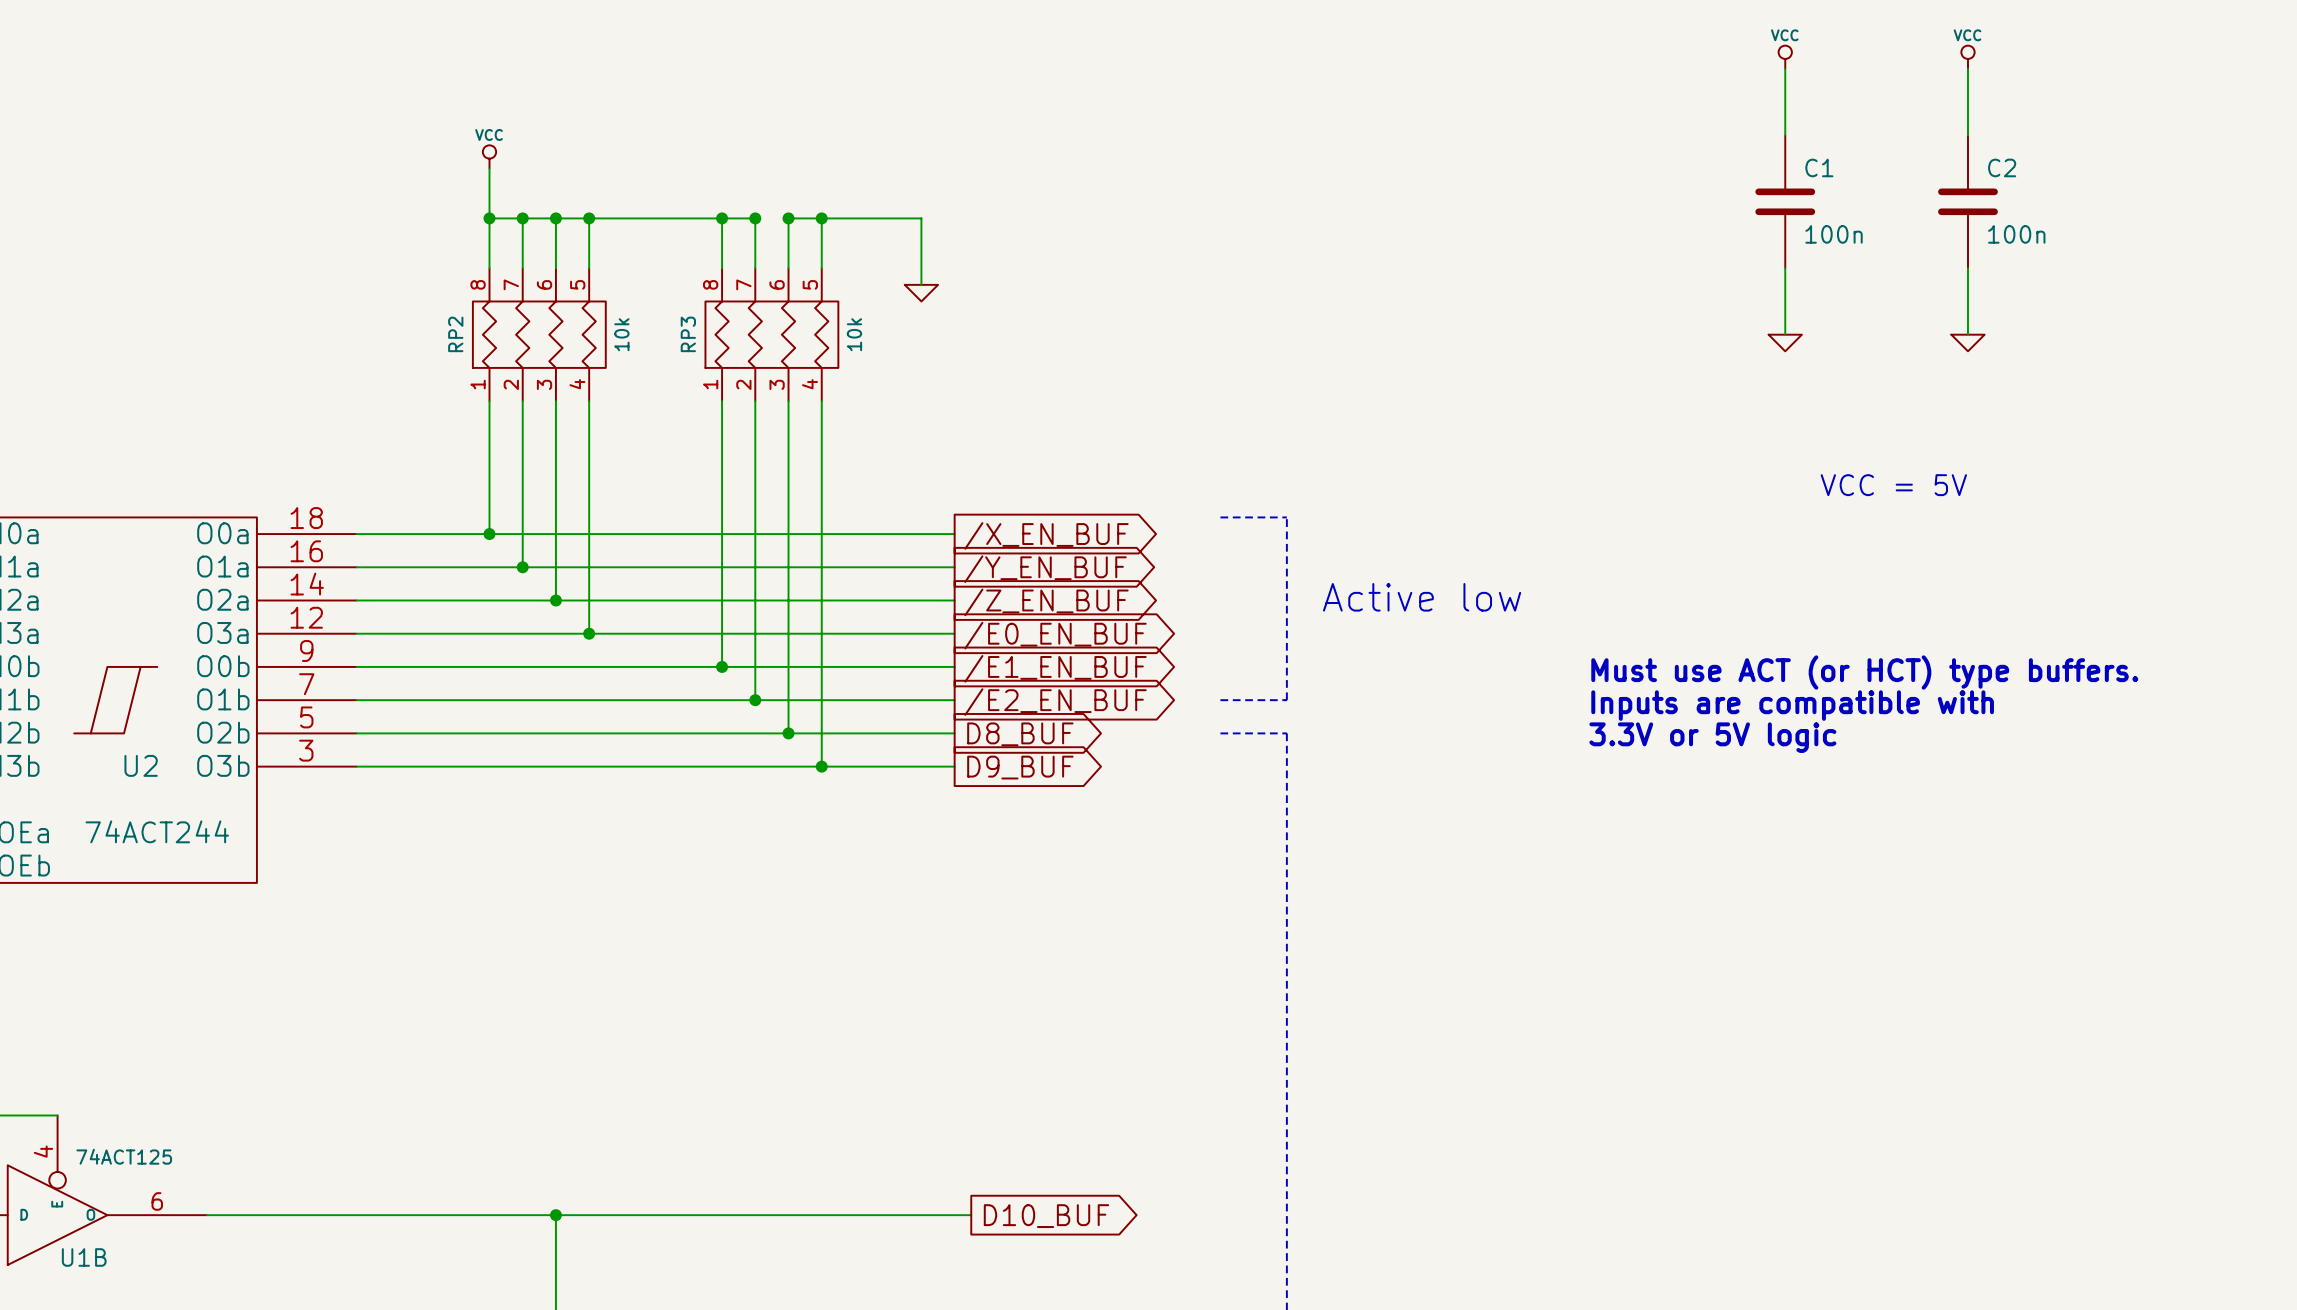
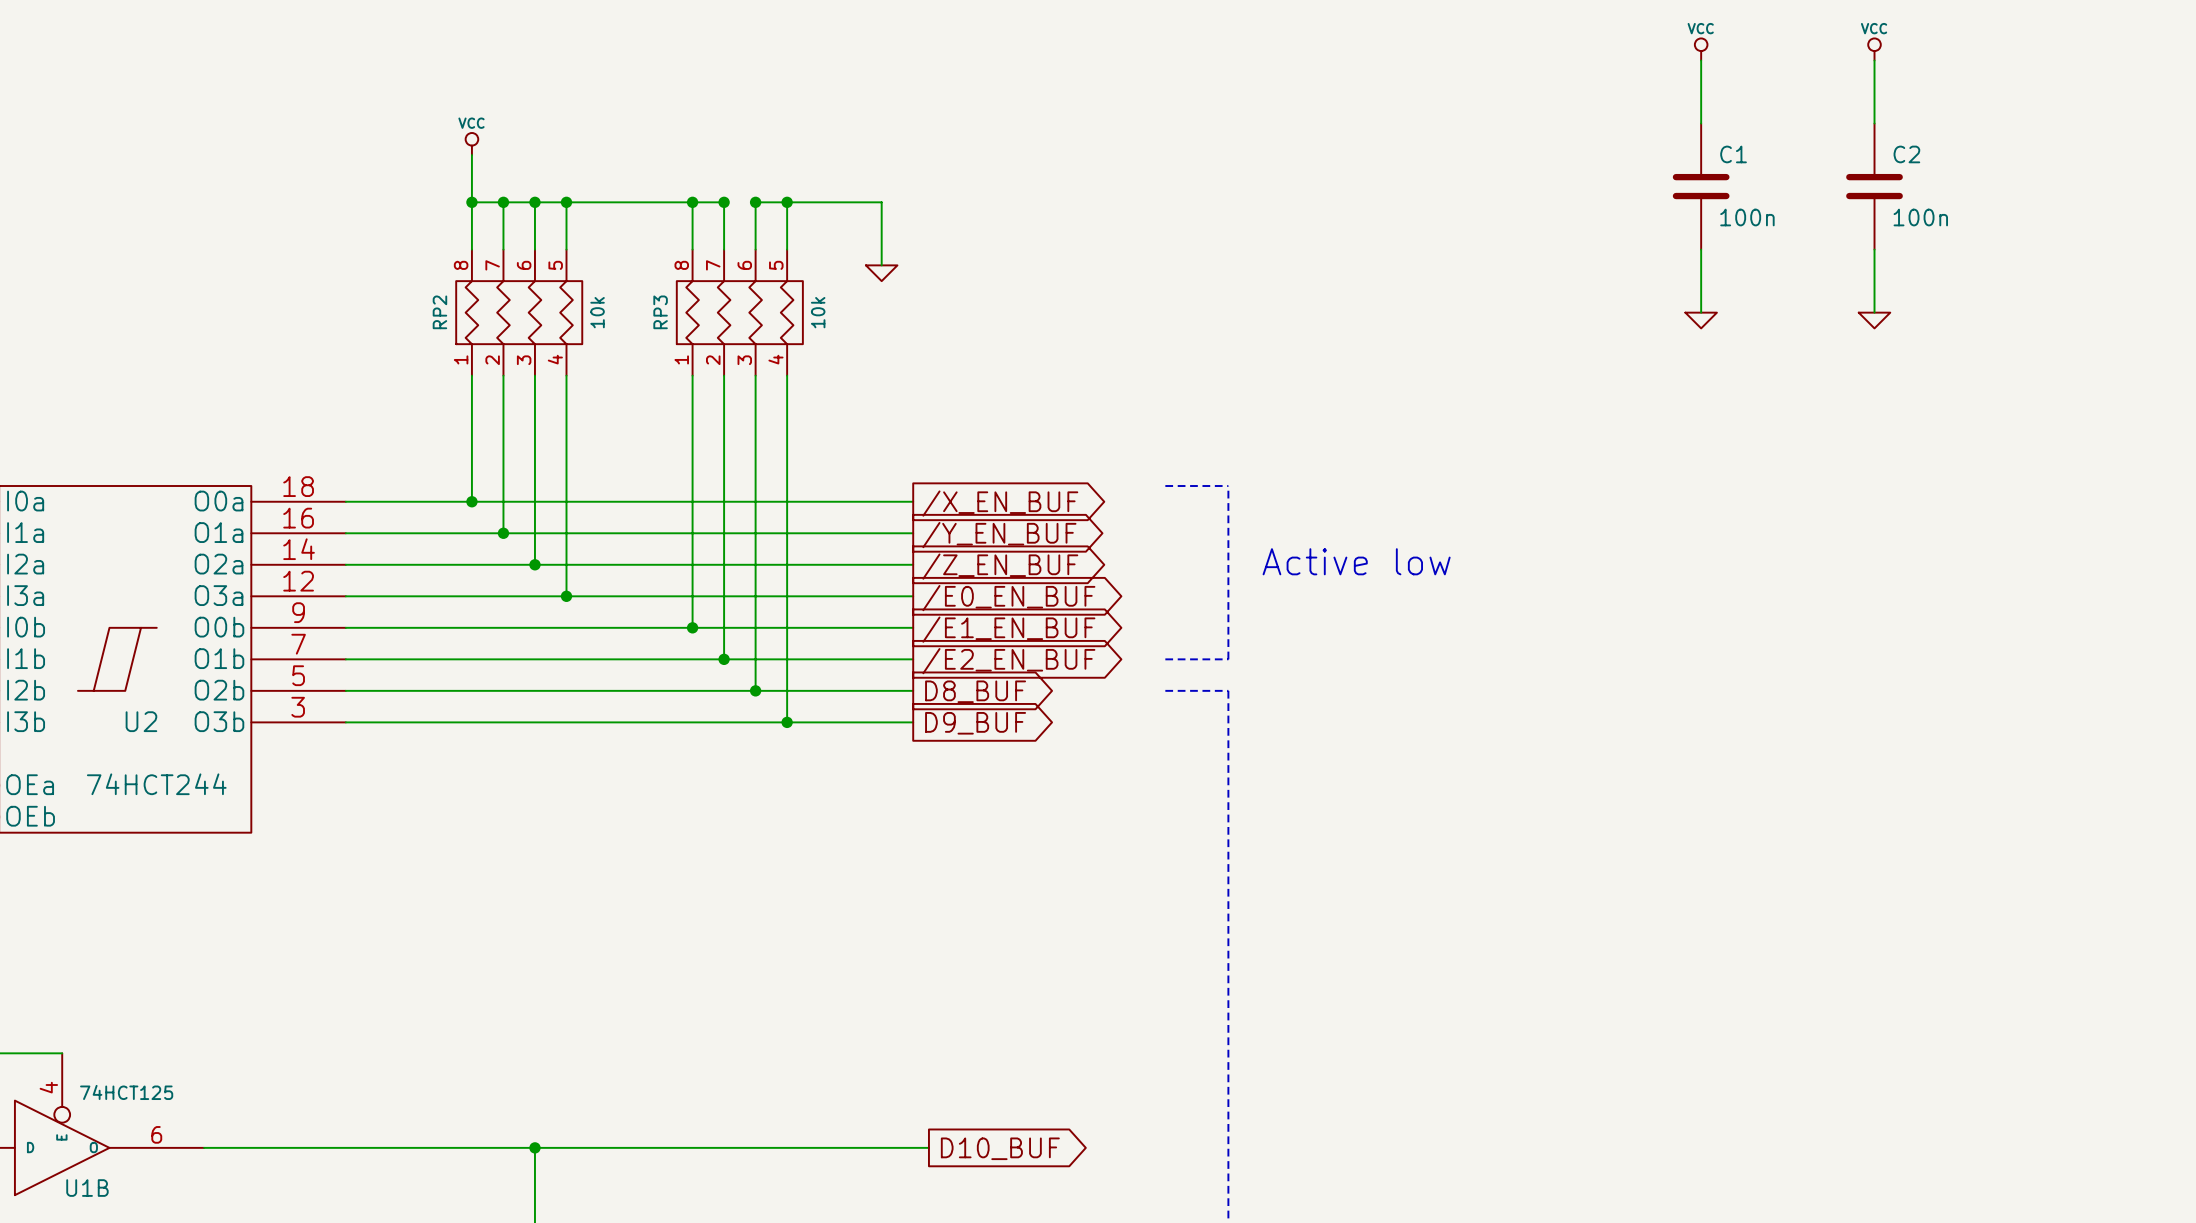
text: VCC = 5V (1893, 485) -> none
text: Must use ACT (or HCT) type buffers. (1864, 672) -> none
text: Inputs are compatible with (1792, 705) -> none
text: 3.3V or 5V logic (1712, 737) -> none
U2 value: 74ACT244 (157, 831) -> 74HCT244 (156, 784)
U1B value: 74ACT125 (124, 1156) -> 74HCT125 (126, 1092)

